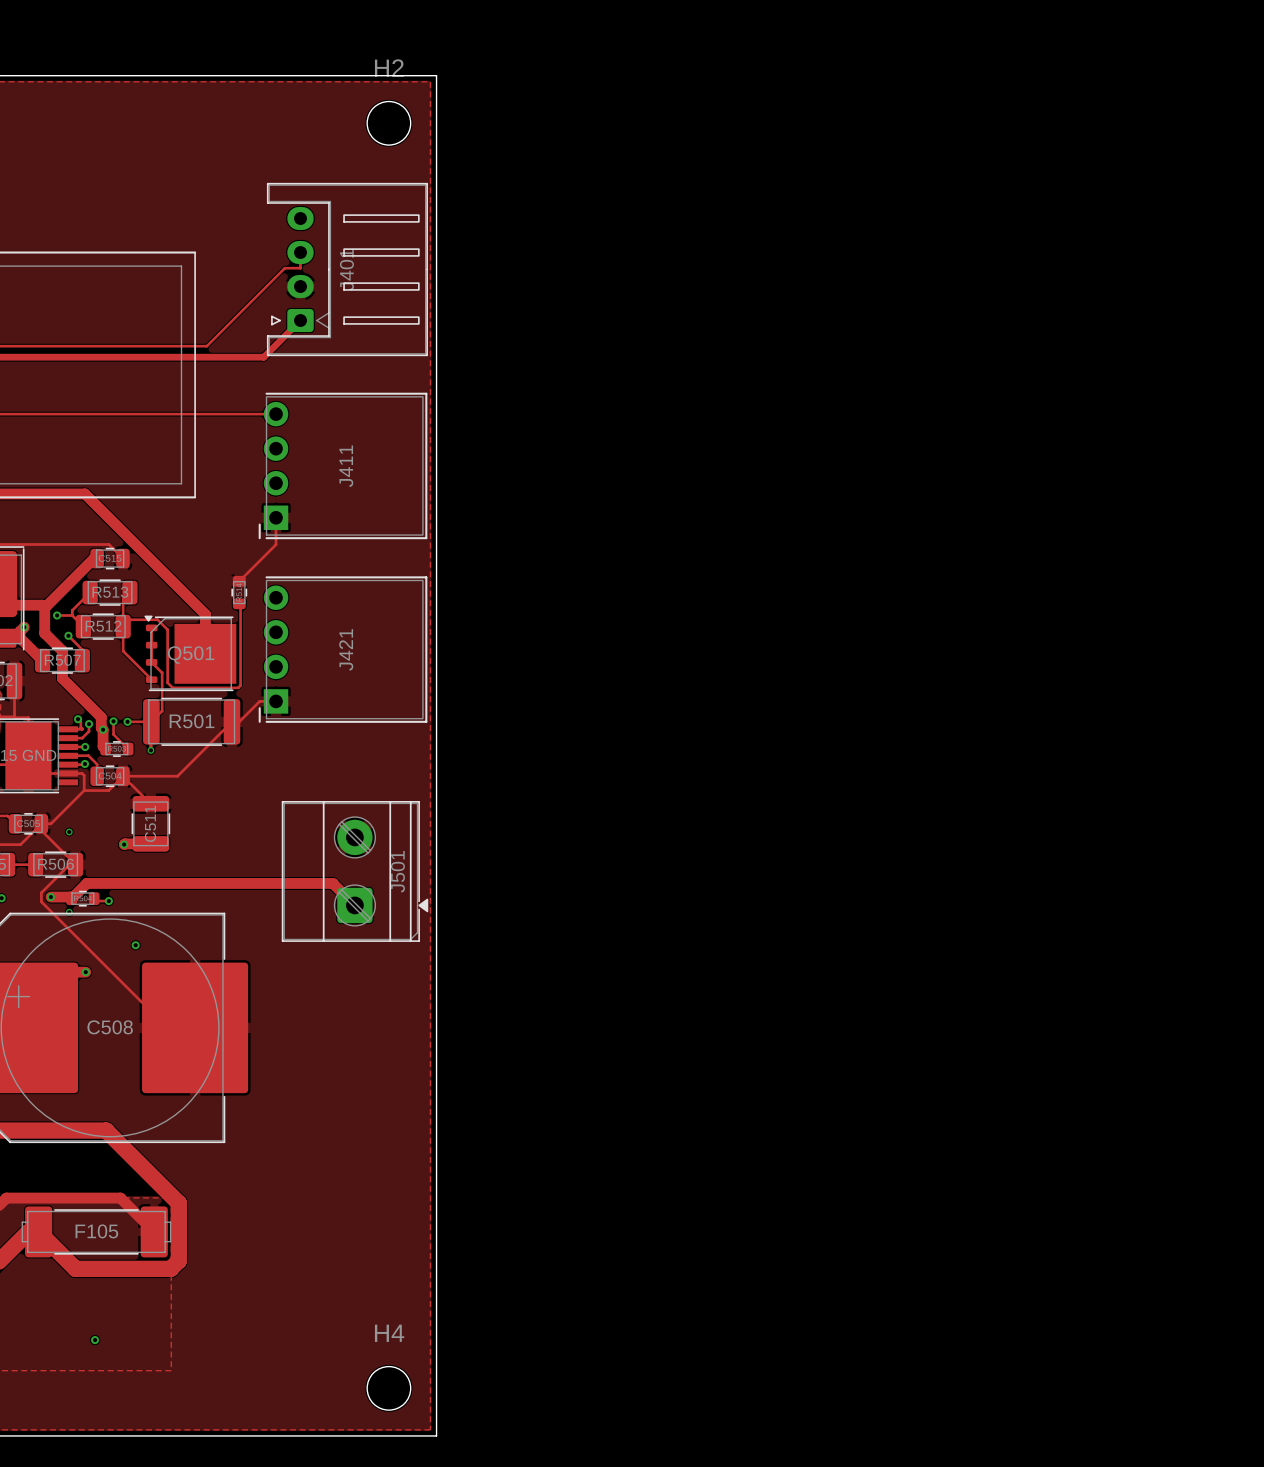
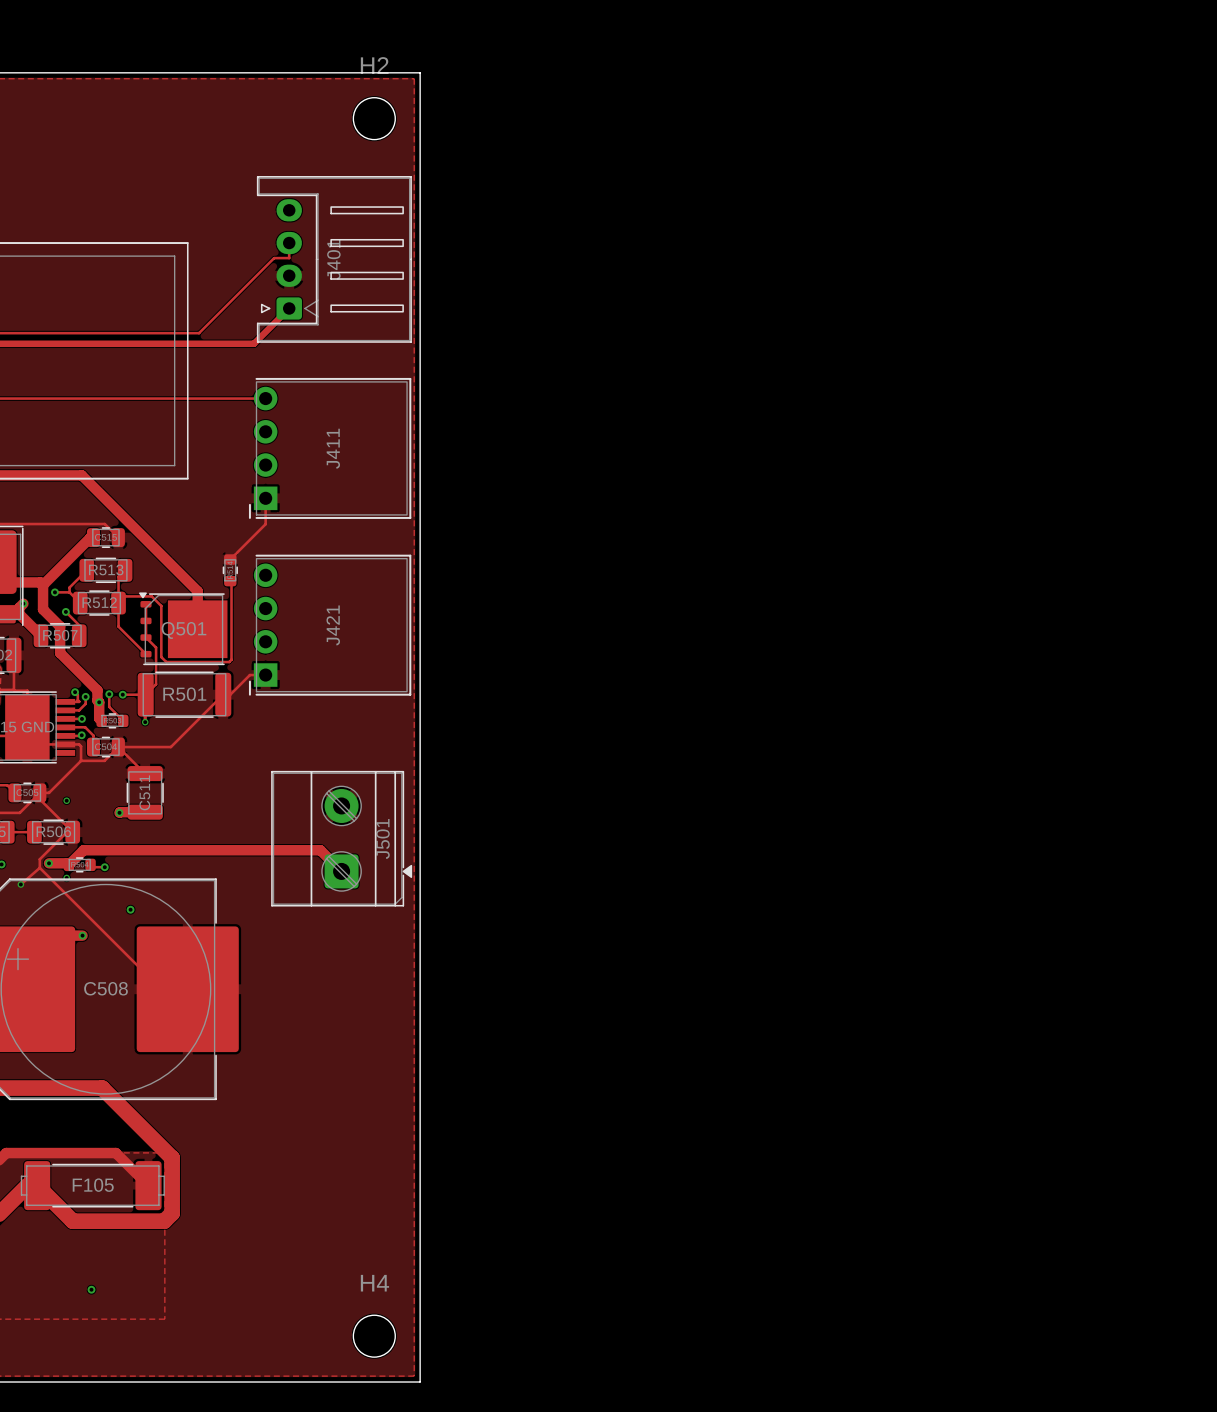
track: none -> (39, 867) (20, 884)
via: none -> (20, 884)

